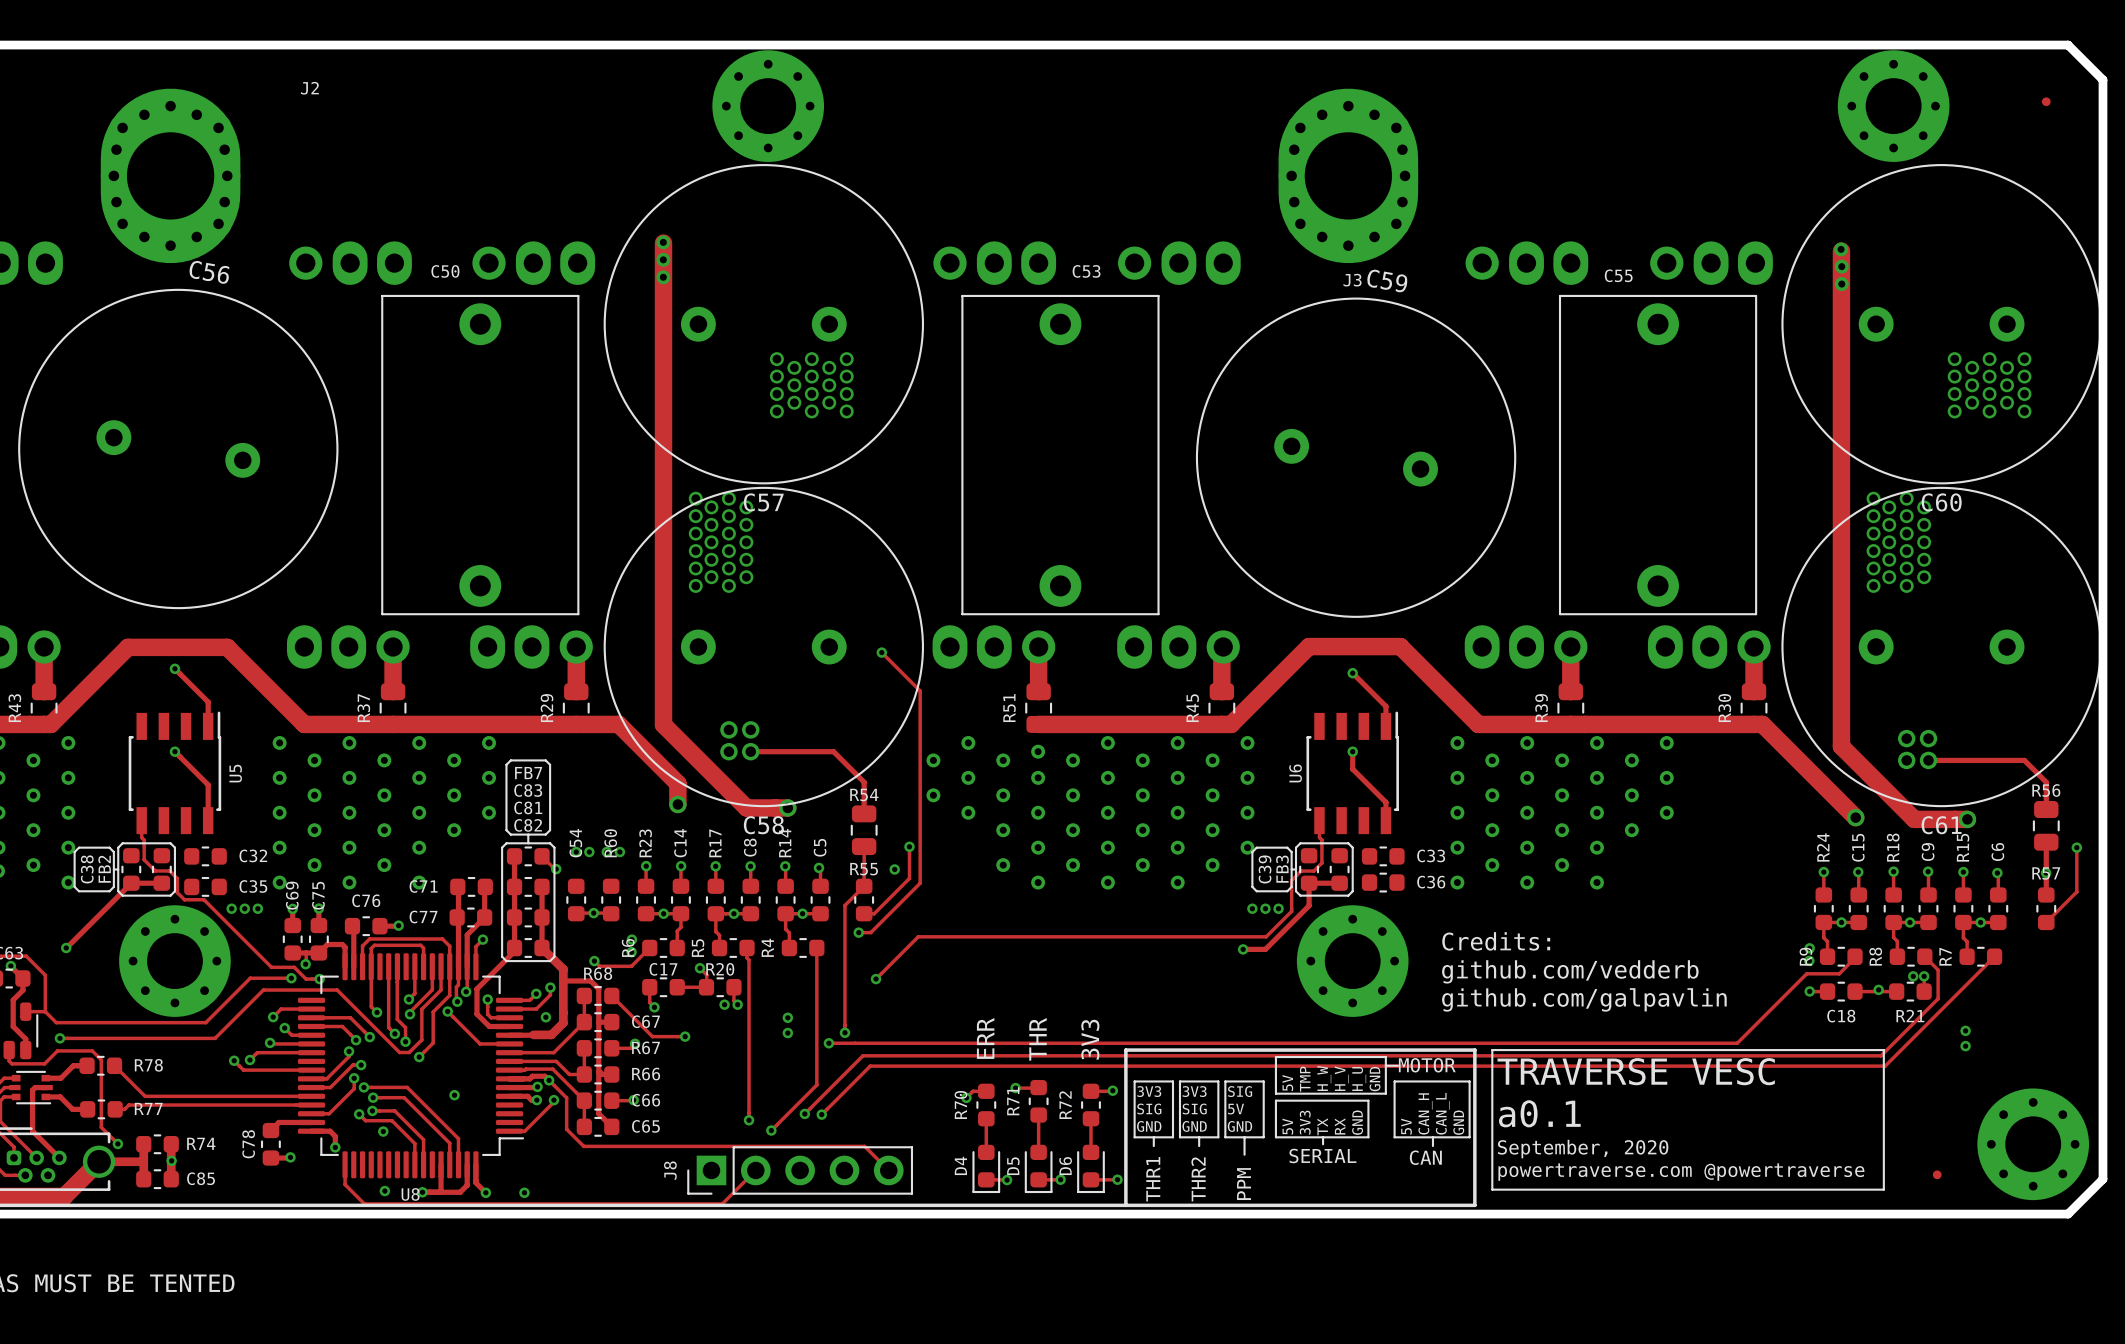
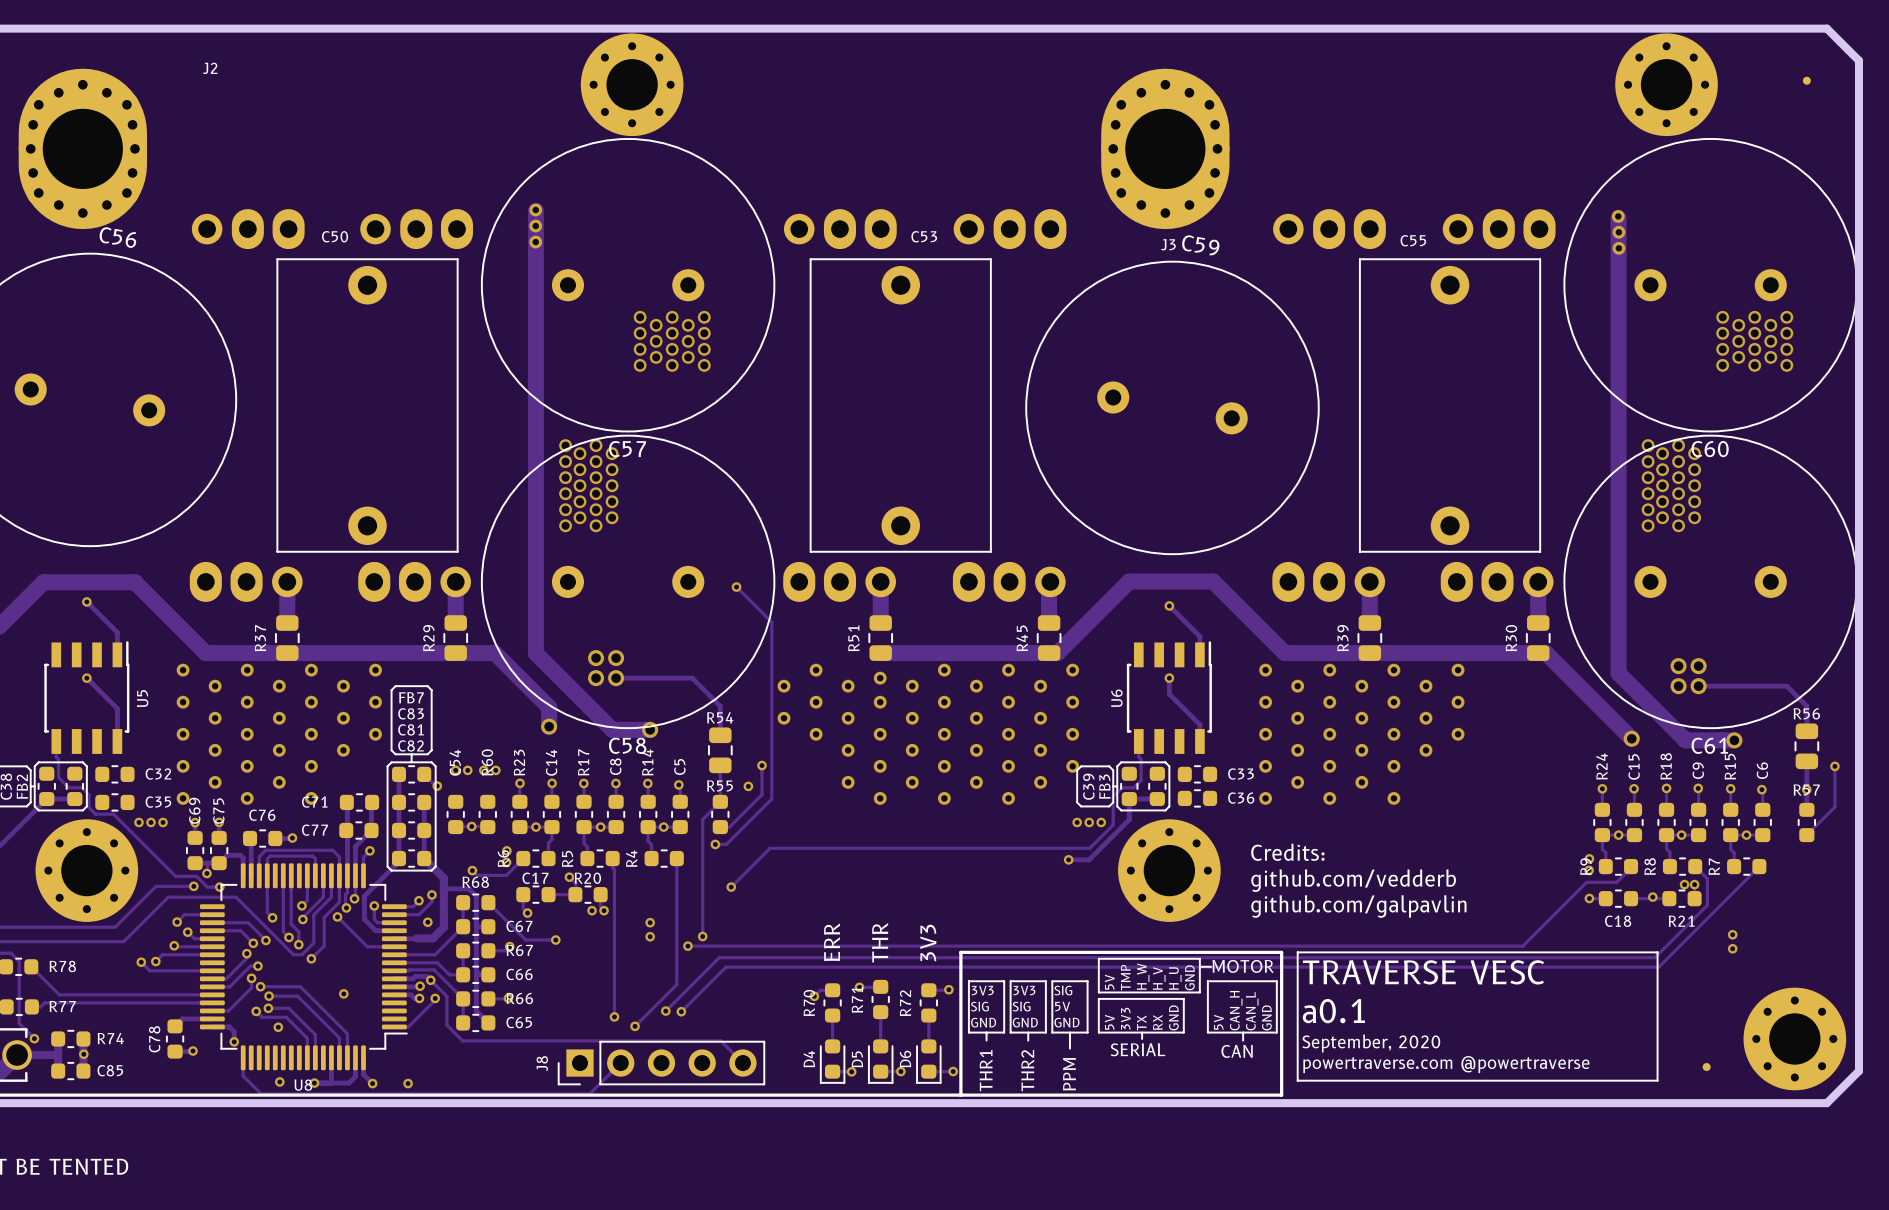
R66 name: R66 (646, 1074) -> C66 (519, 974)
C66 name: C66 (646, 1100) -> R66 (519, 998)

